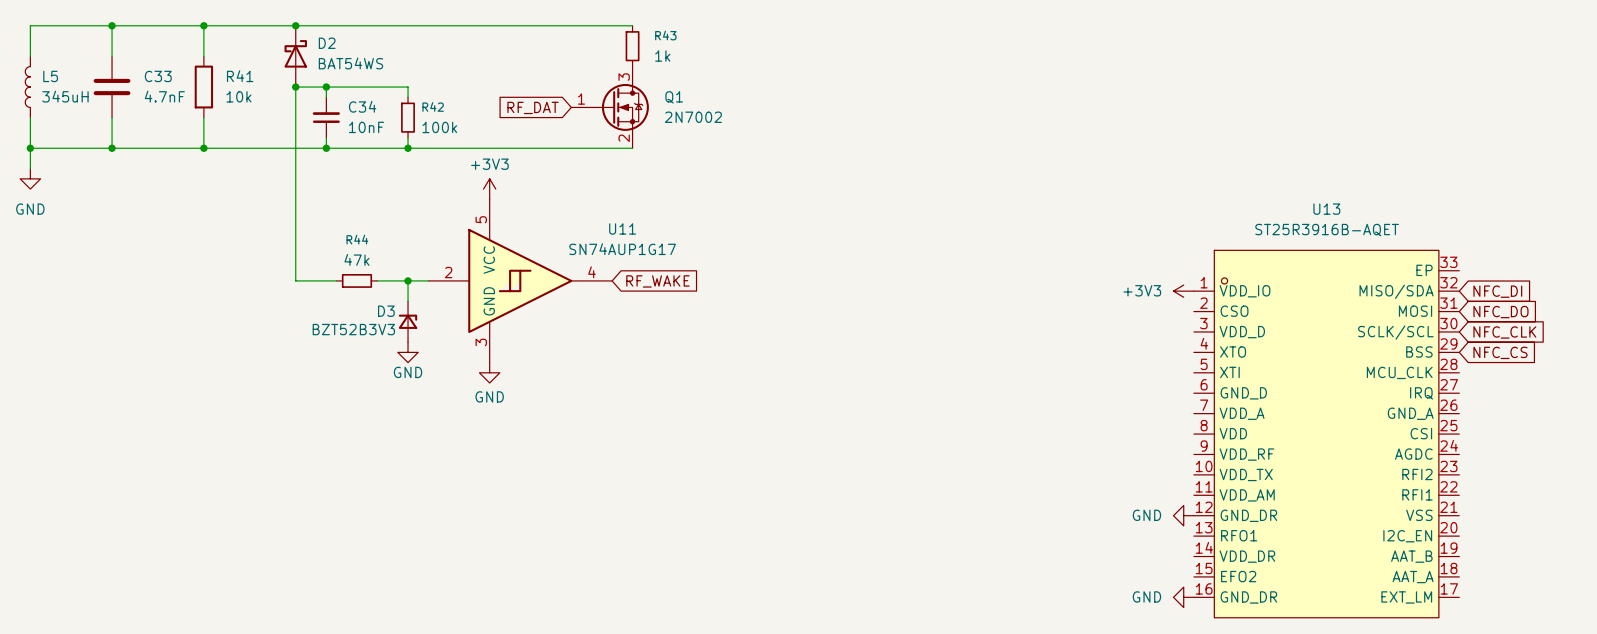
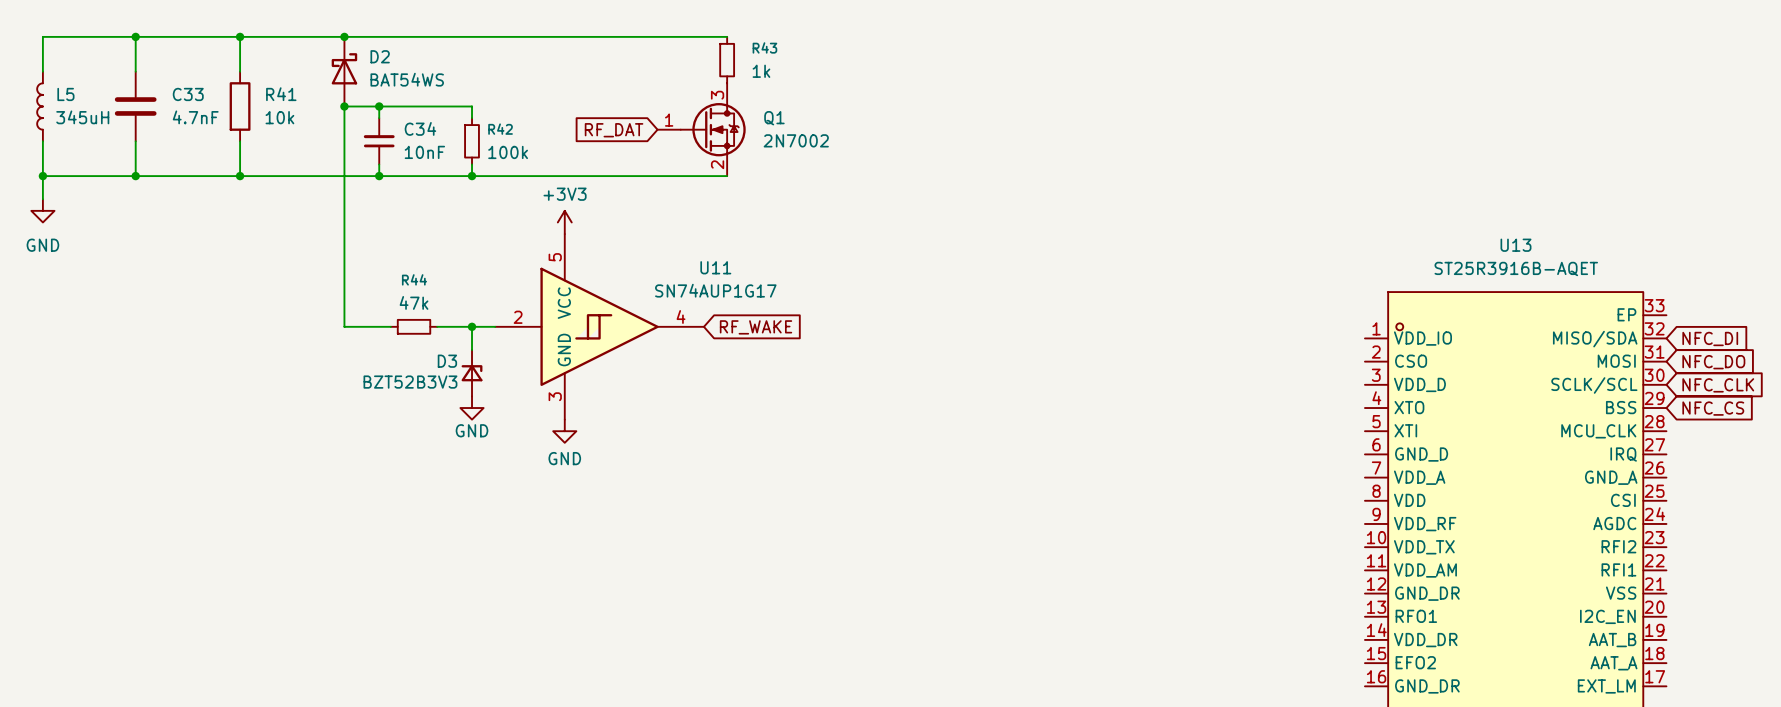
power symbol: +3V3 (1183, 291) -> none
power symbol: GND (1183, 515) -> none
power symbol: GND (1183, 597) -> none

